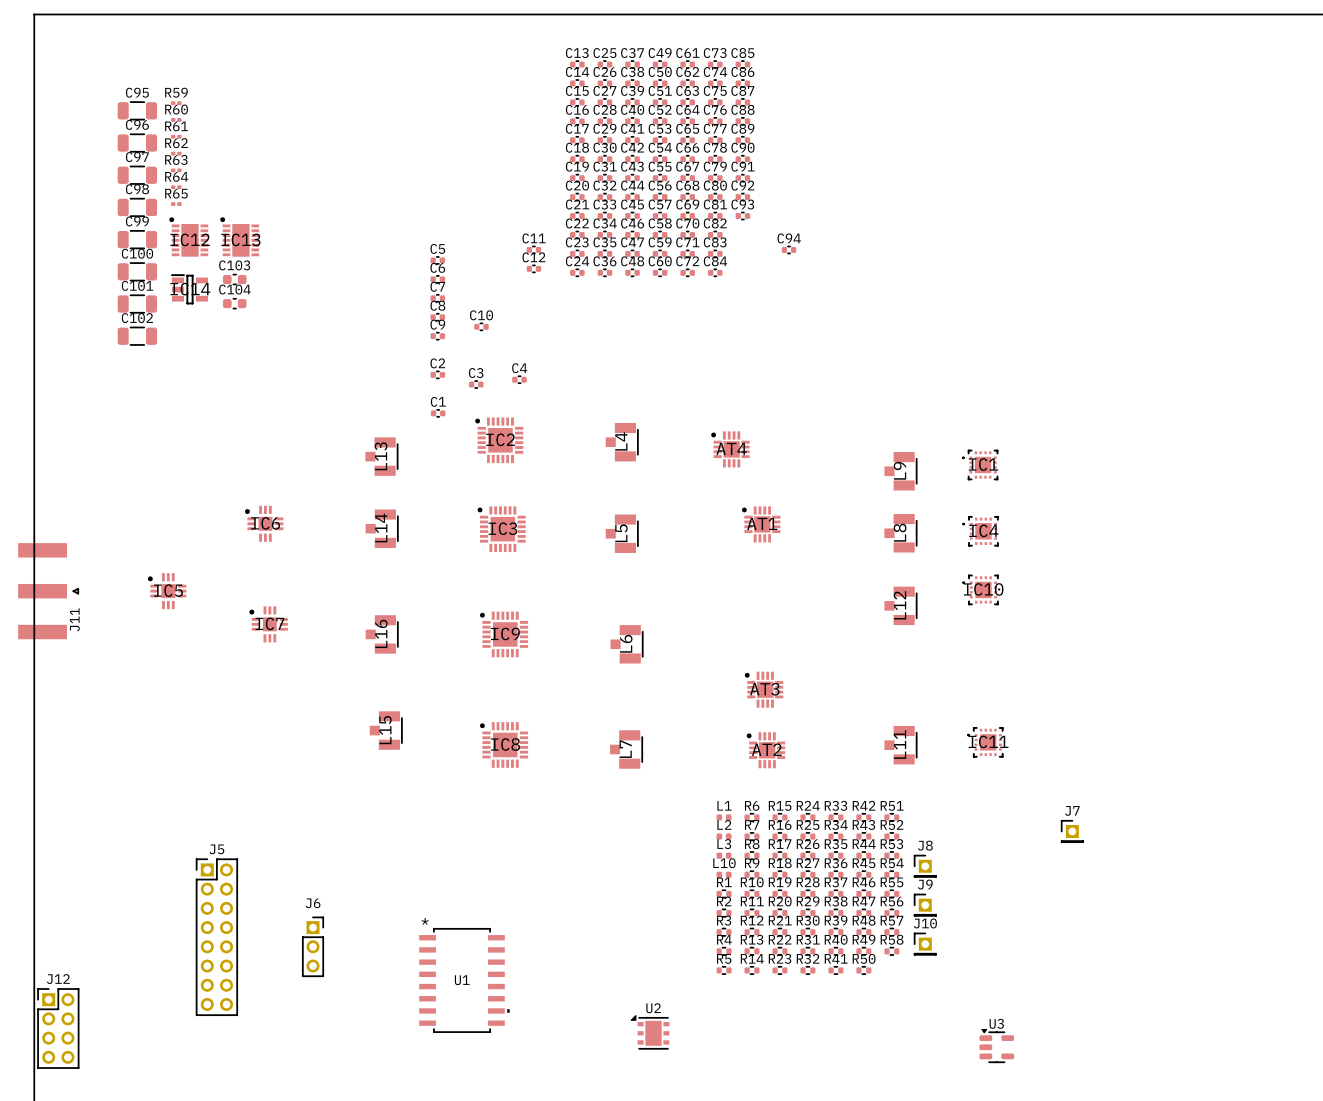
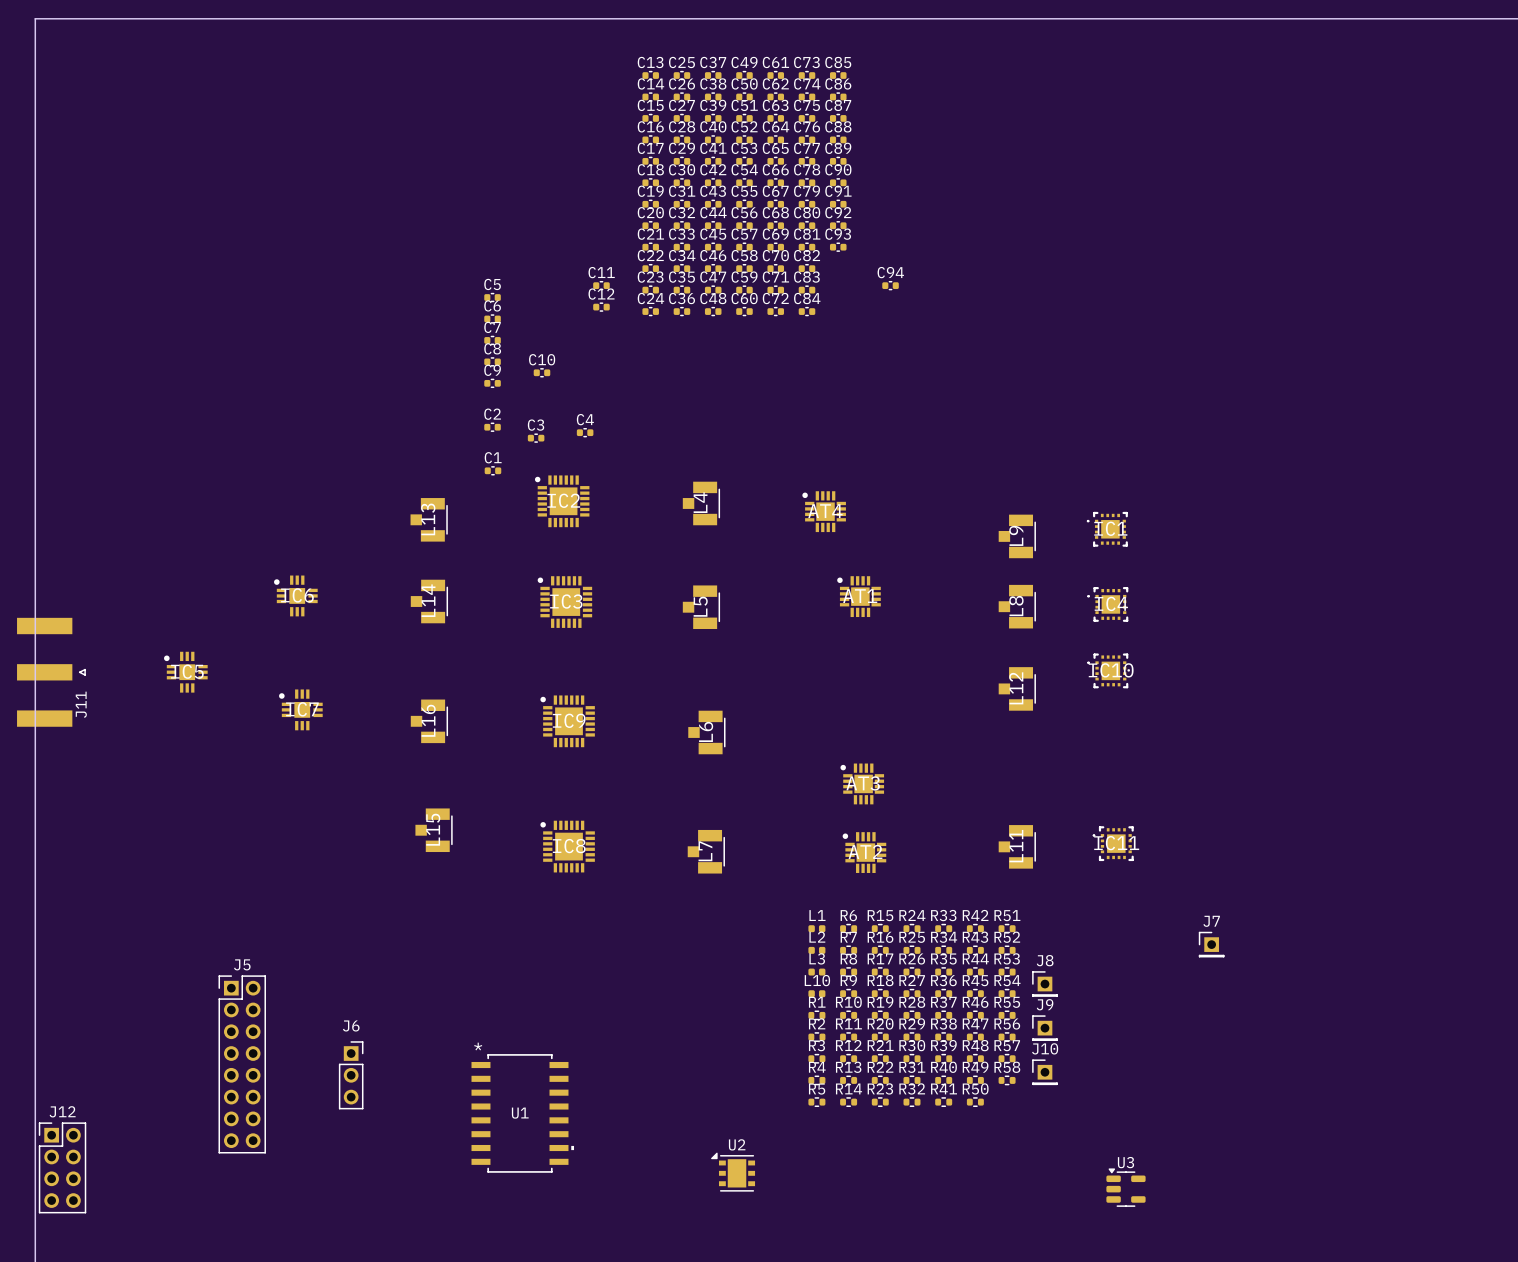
R59: (176, 103) -> none
C95: (137, 110) -> none
R60: (176, 119) -> none
R61: (176, 136) -> none
C96: (137, 143) -> none
R62: (176, 153) -> none
R63: (176, 170) -> none
C97: (137, 175) -> none
R64: (176, 187) -> none
R65: (176, 204) -> none
C98: (137, 207) -> none
IC12: (188, 236) -> none
IC13: (239, 236) -> none
C99: (137, 239) -> none
C100: (137, 271) -> none
C103: (234, 279) -> none
IC14: (189, 289) -> none
C104: (234, 303) -> none
C101: (137, 304) -> none
C102: (137, 336) -> none

